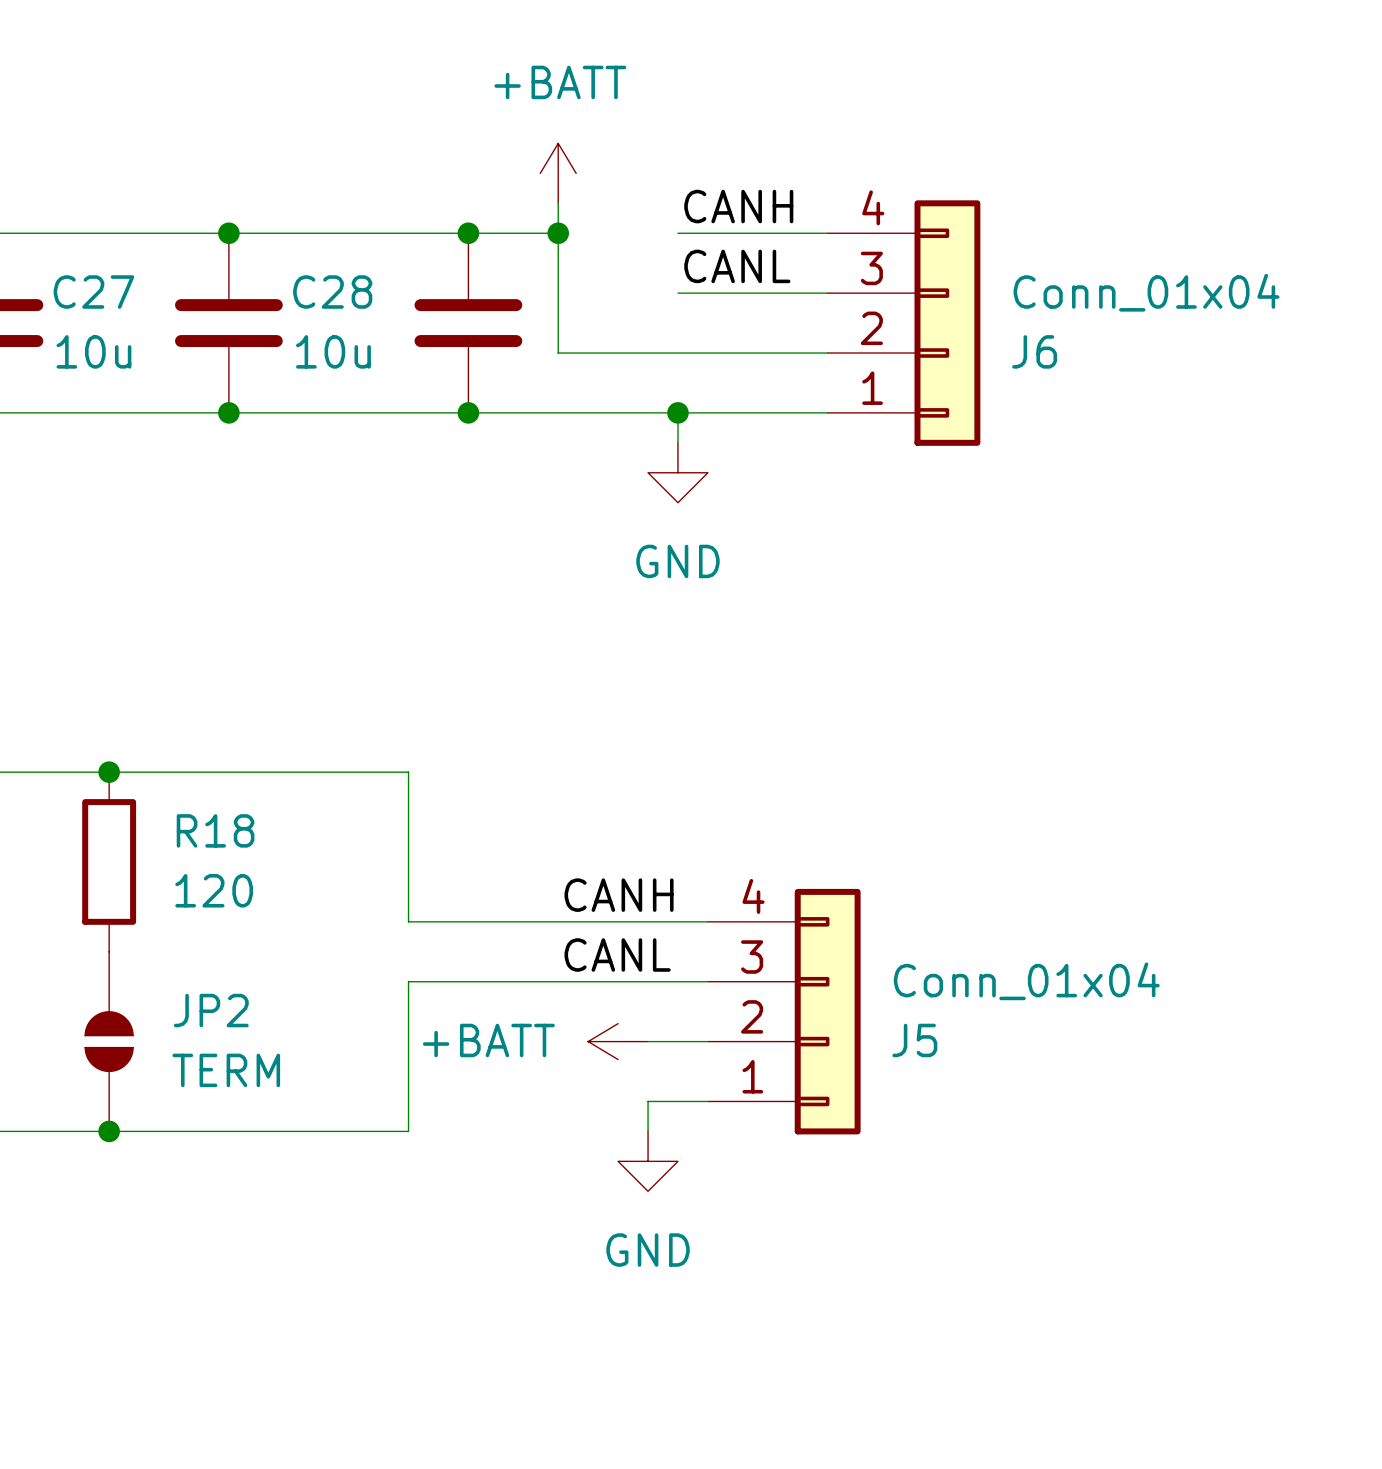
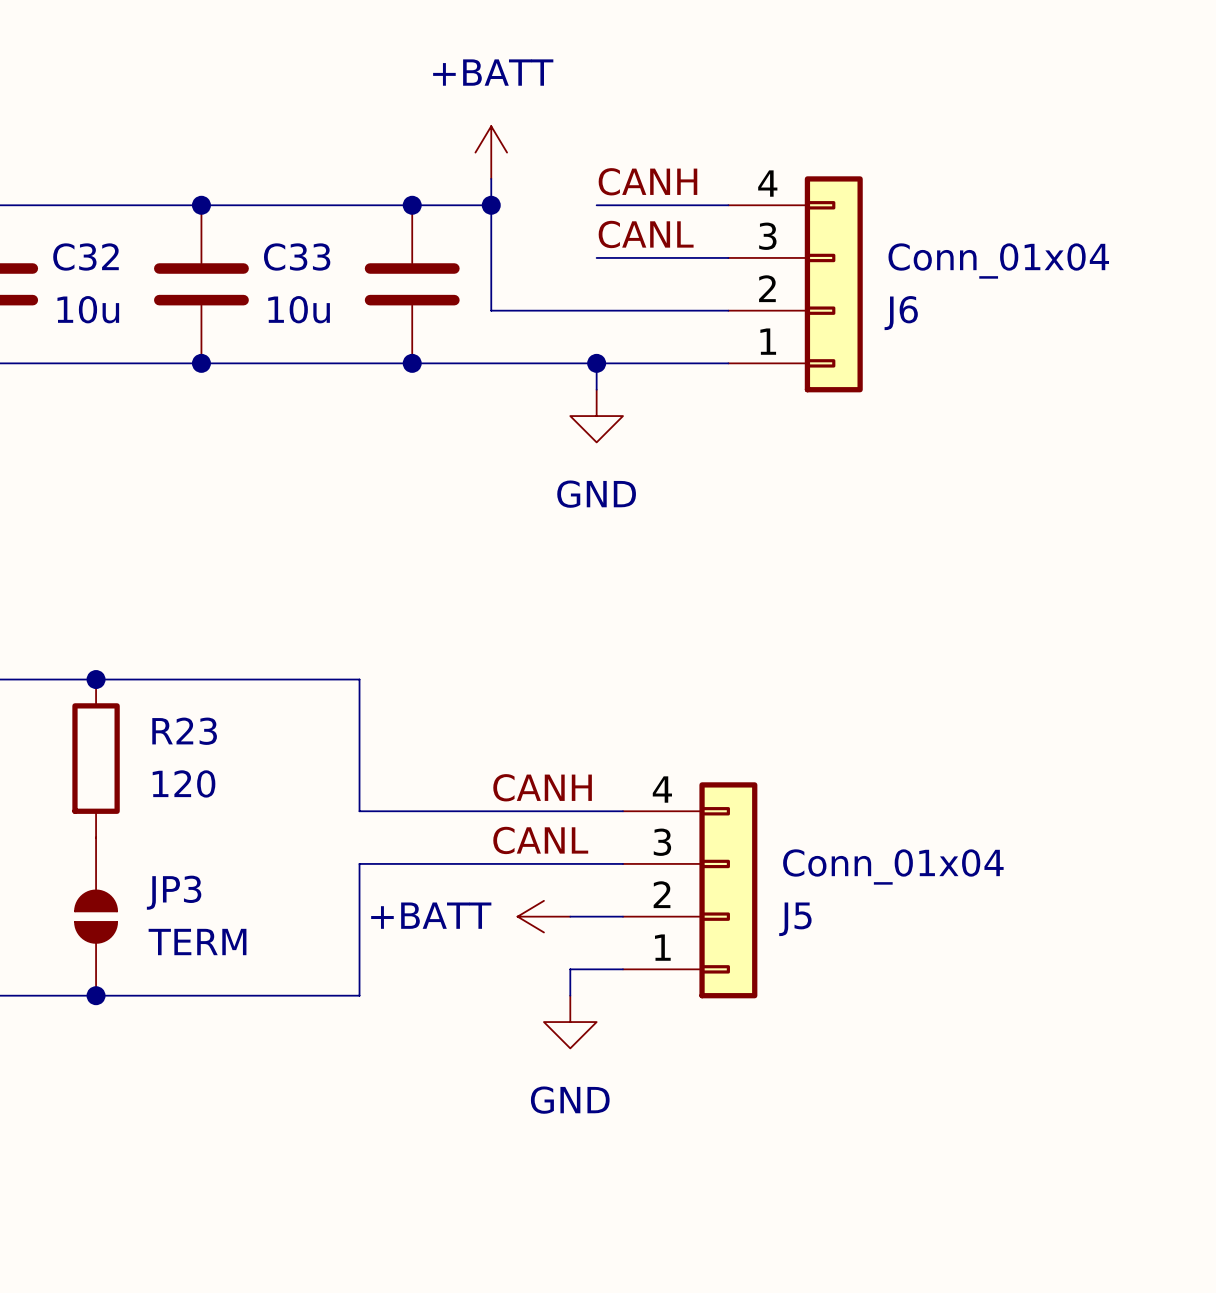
C27 name: C27 (93, 292) -> C32 (86, 257)
C28 name: C28 (332, 292) -> C33 (297, 257)
R18 name: R18 (215, 830) -> R23 (184, 731)
JP2 name: JP2 (211, 1010) -> JP3 (174, 892)

